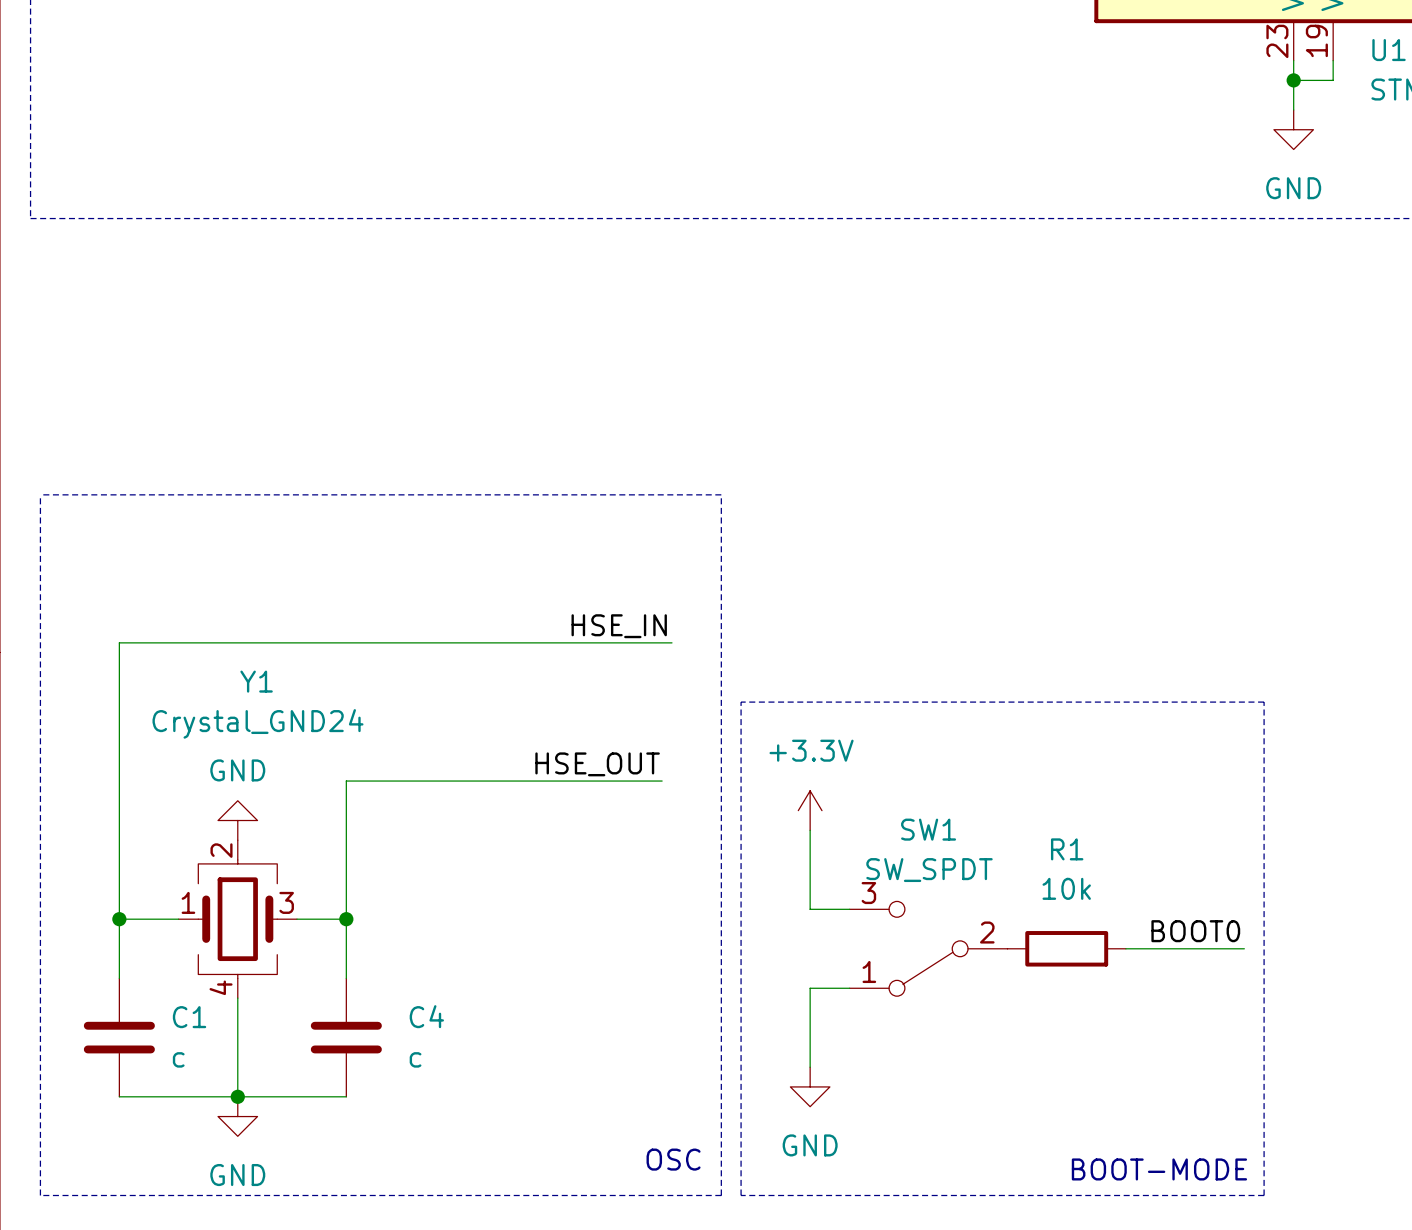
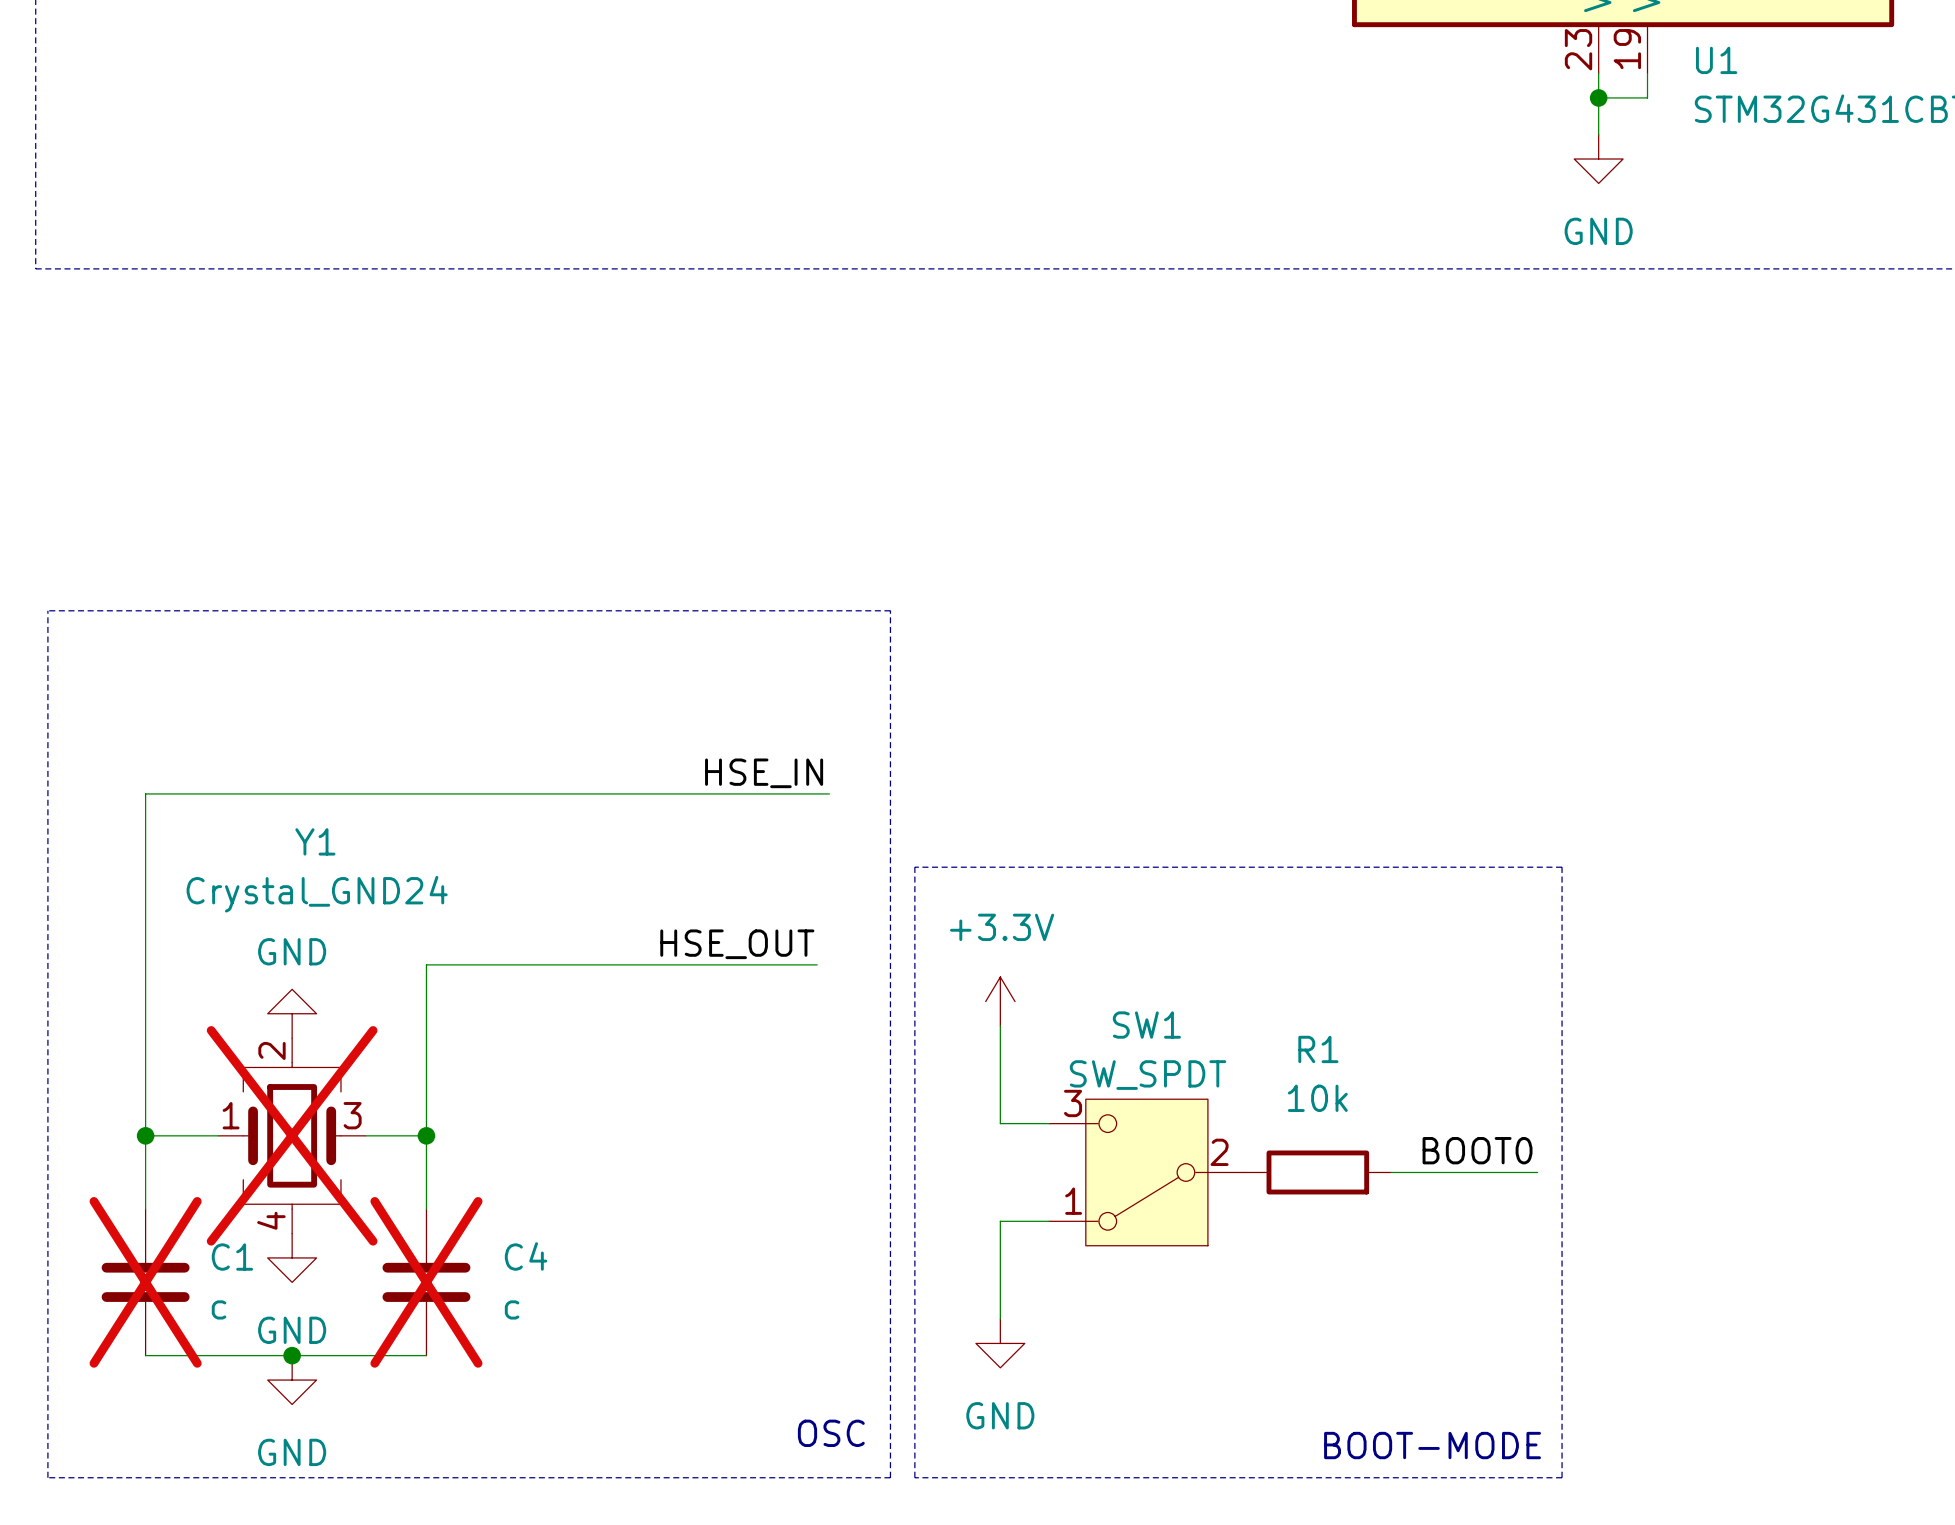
SW1 symbol: [849, 901, 1008, 997] -> [1049, 1099, 1245, 1246]
Y1 do-not-place cross: none -> (292, 1135)
wire: (237, 998) (237, 1096) -> none
power symbol: none -> GND (292, 1257)
C1 do-not-place cross: none -> (145, 1282)
C4 do-not-place cross: none -> (426, 1282)

